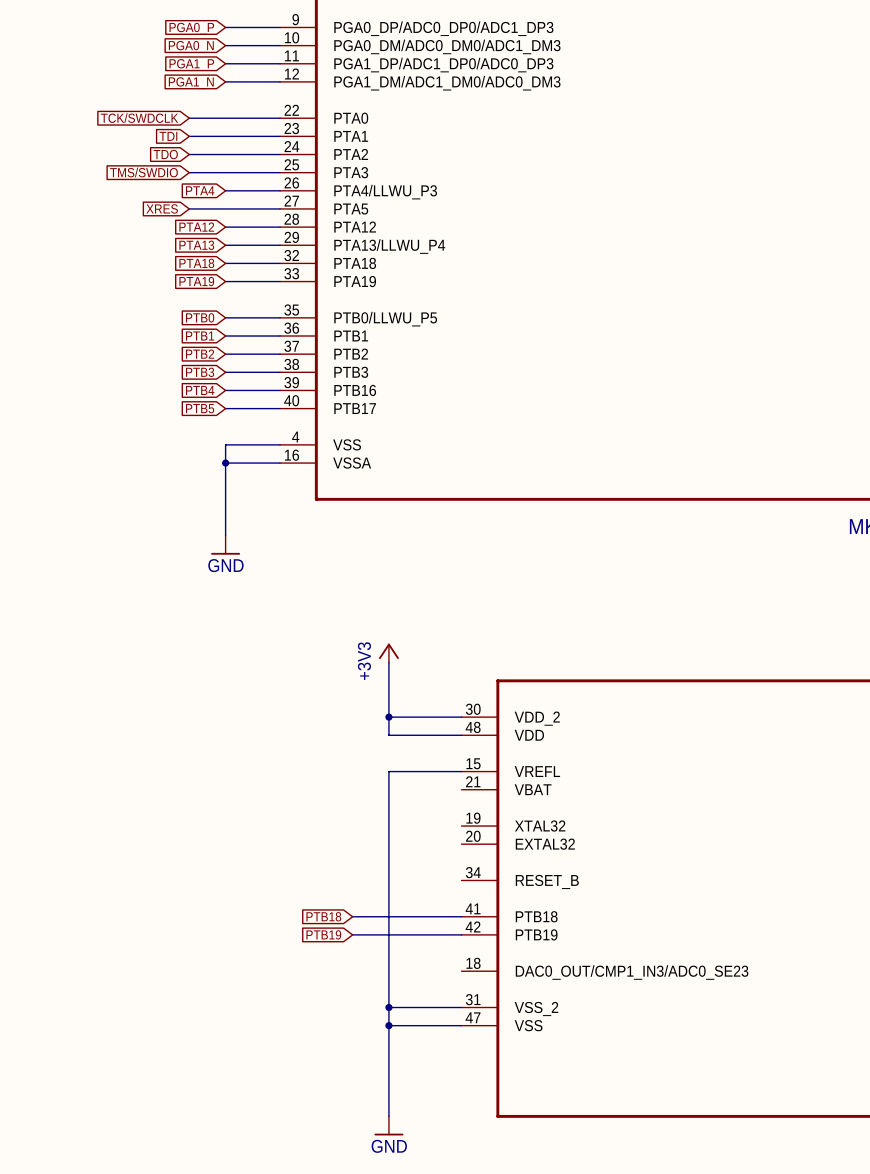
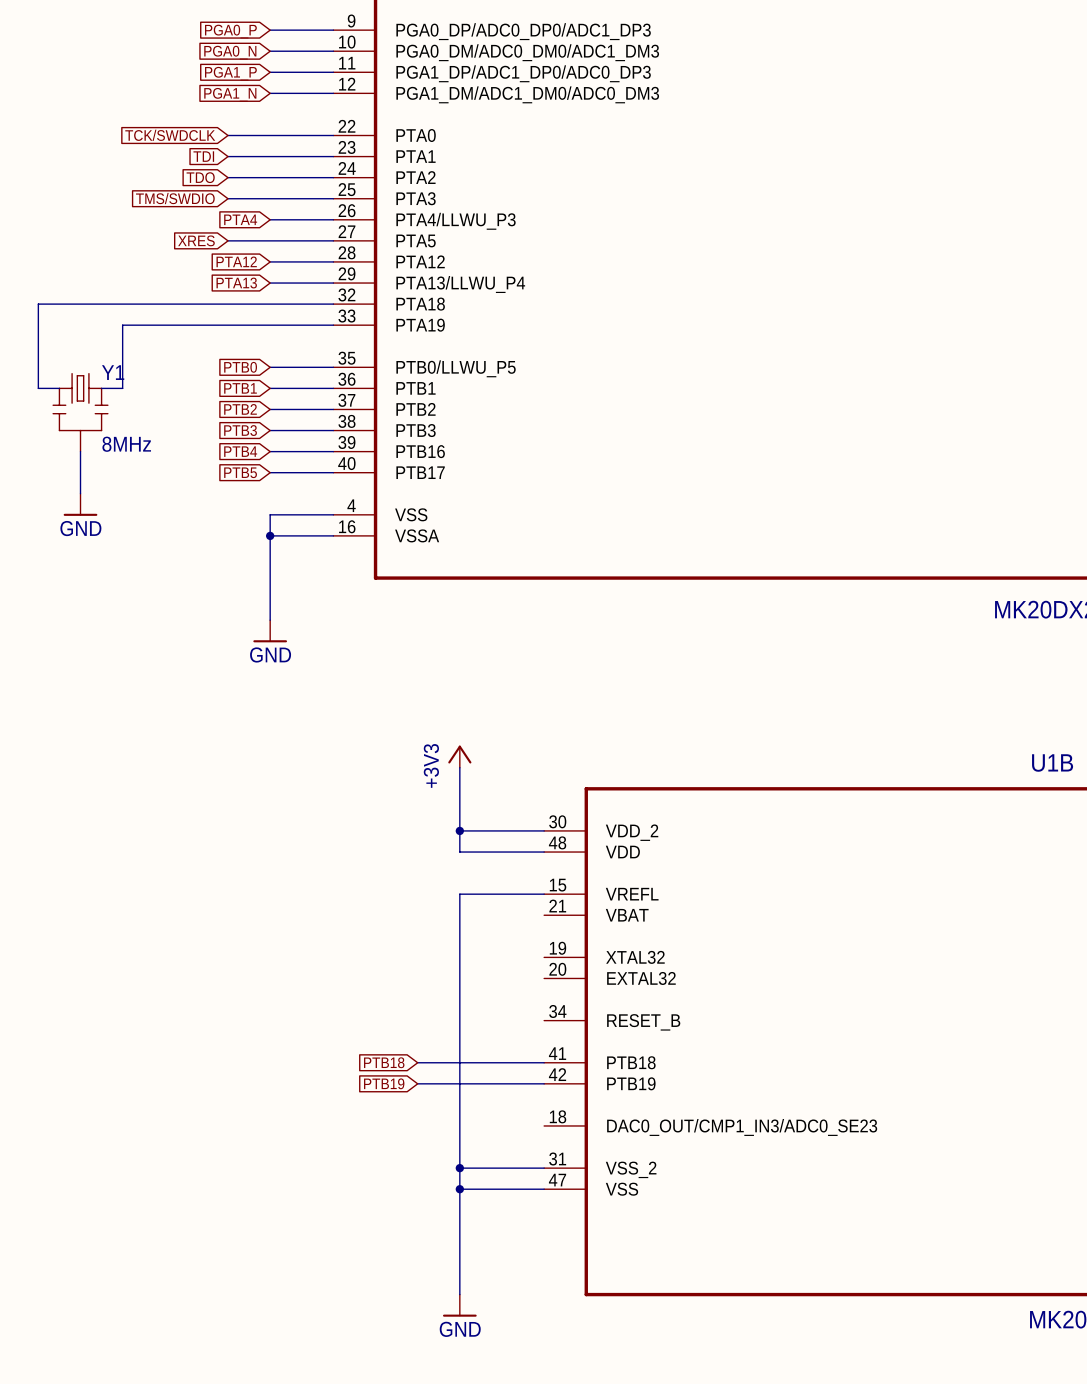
global label: PTA18 (196, 263) -> none
wire: none -> (270, 304) (38, 304) (38, 388) (59, 388)
global label: PTA19 (196, 281) -> none
wire: none -> (270, 325) (122, 325) (122, 388) (101, 388)
Y1: none -> 8MHz (80, 412)
wire: none -> (80, 451) (80, 493)
power symbol: none -> GND (80, 504)

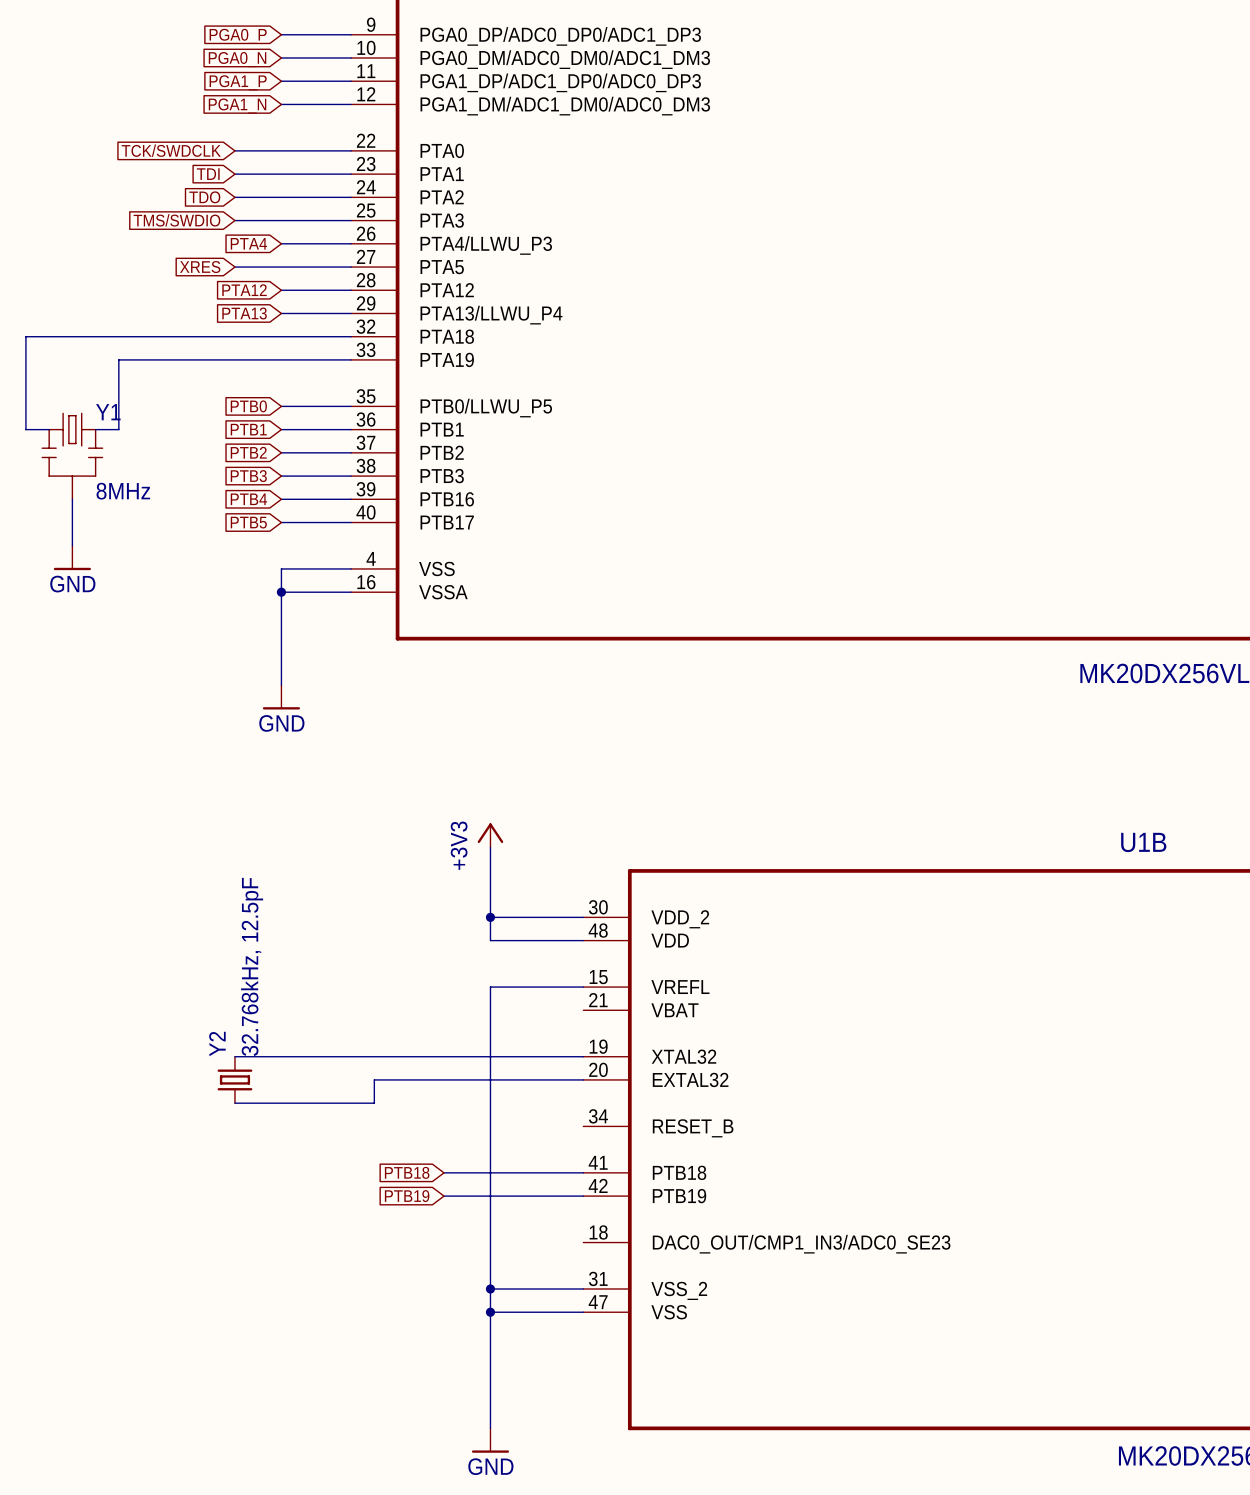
wire: none -> (234, 1056) (583, 1056)
Y2: none -> 32.768kHz, 12.5pF (234, 1079)
wire: none -> (583, 1079) (374, 1079) (374, 1103) (234, 1103)

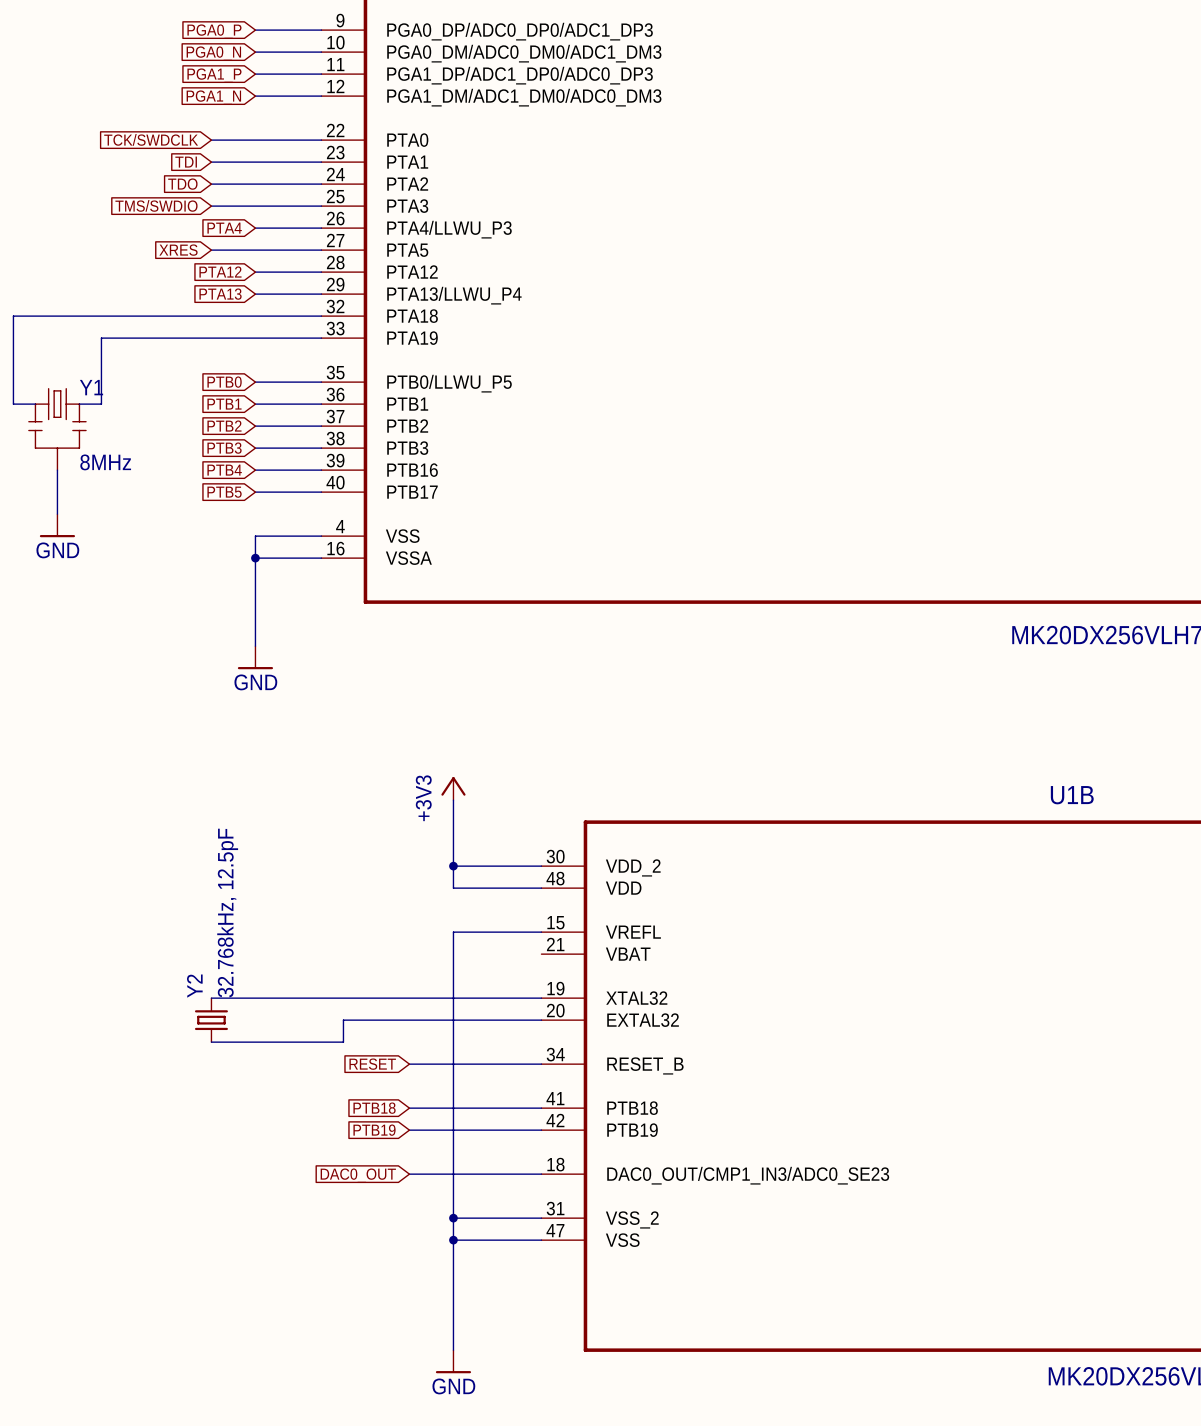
global label: none -> RESET (372, 1064)
wire: none -> (409, 1064) (541, 1064)
wire: none -> (409, 1174) (541, 1174)
global label: none -> DAC0_OUT (358, 1175)

